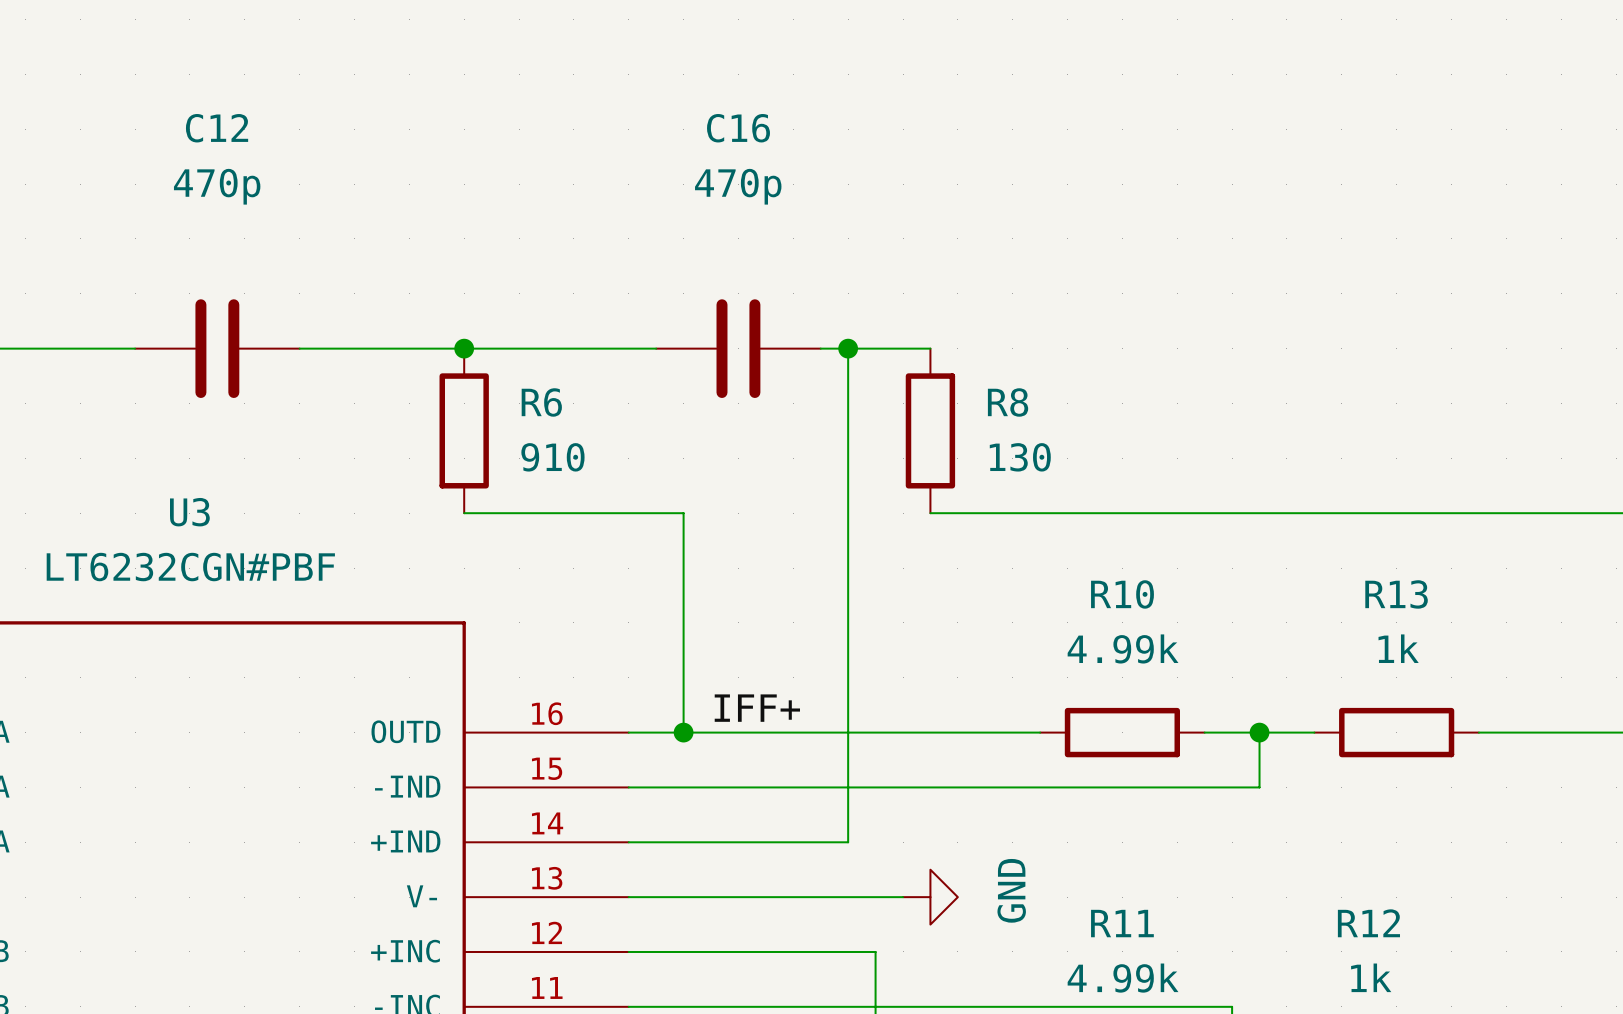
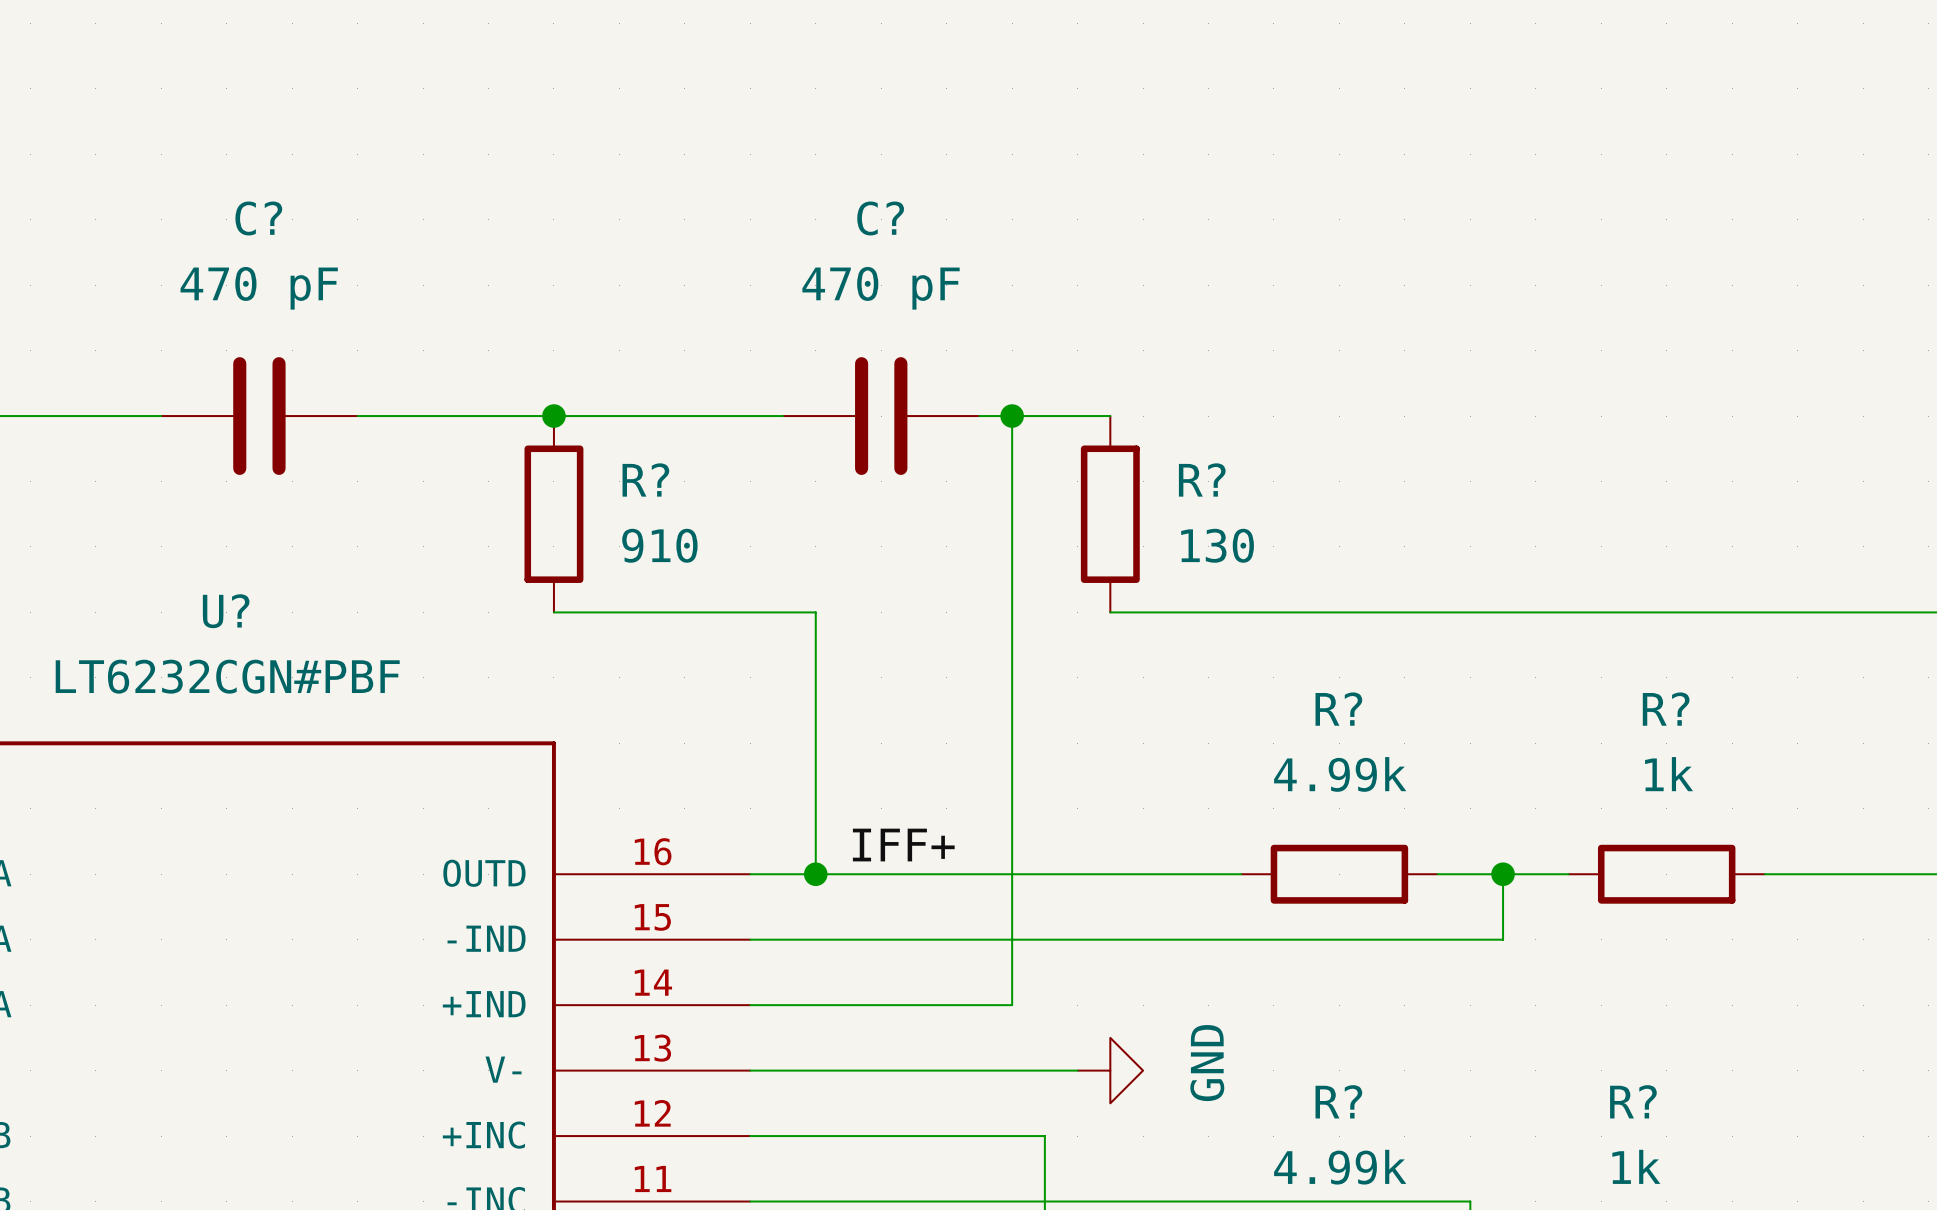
C12 name: C12 (217, 128) -> C? (258, 218)
C16 name: C16 (738, 128) -> C? (880, 218)
C12 value: 470p (217, 186) -> 470 pF (259, 288)
C16 value: 470p (738, 186) -> 470 pF (881, 288)
R6 name: R6 (541, 402) -> R? (645, 479)
R8 name: R8 (1008, 402) -> R? (1202, 479)
U3 name: U3 (189, 512) -> U? (226, 611)
R10 name: R10 (1122, 594) -> R? (1338, 709)
R13 name: R13 (1396, 594) -> R? (1666, 709)
R11 name: R11 (1122, 923) -> R? (1338, 1101)
R12 name: R12 (1368, 923) -> R? (1633, 1101)

